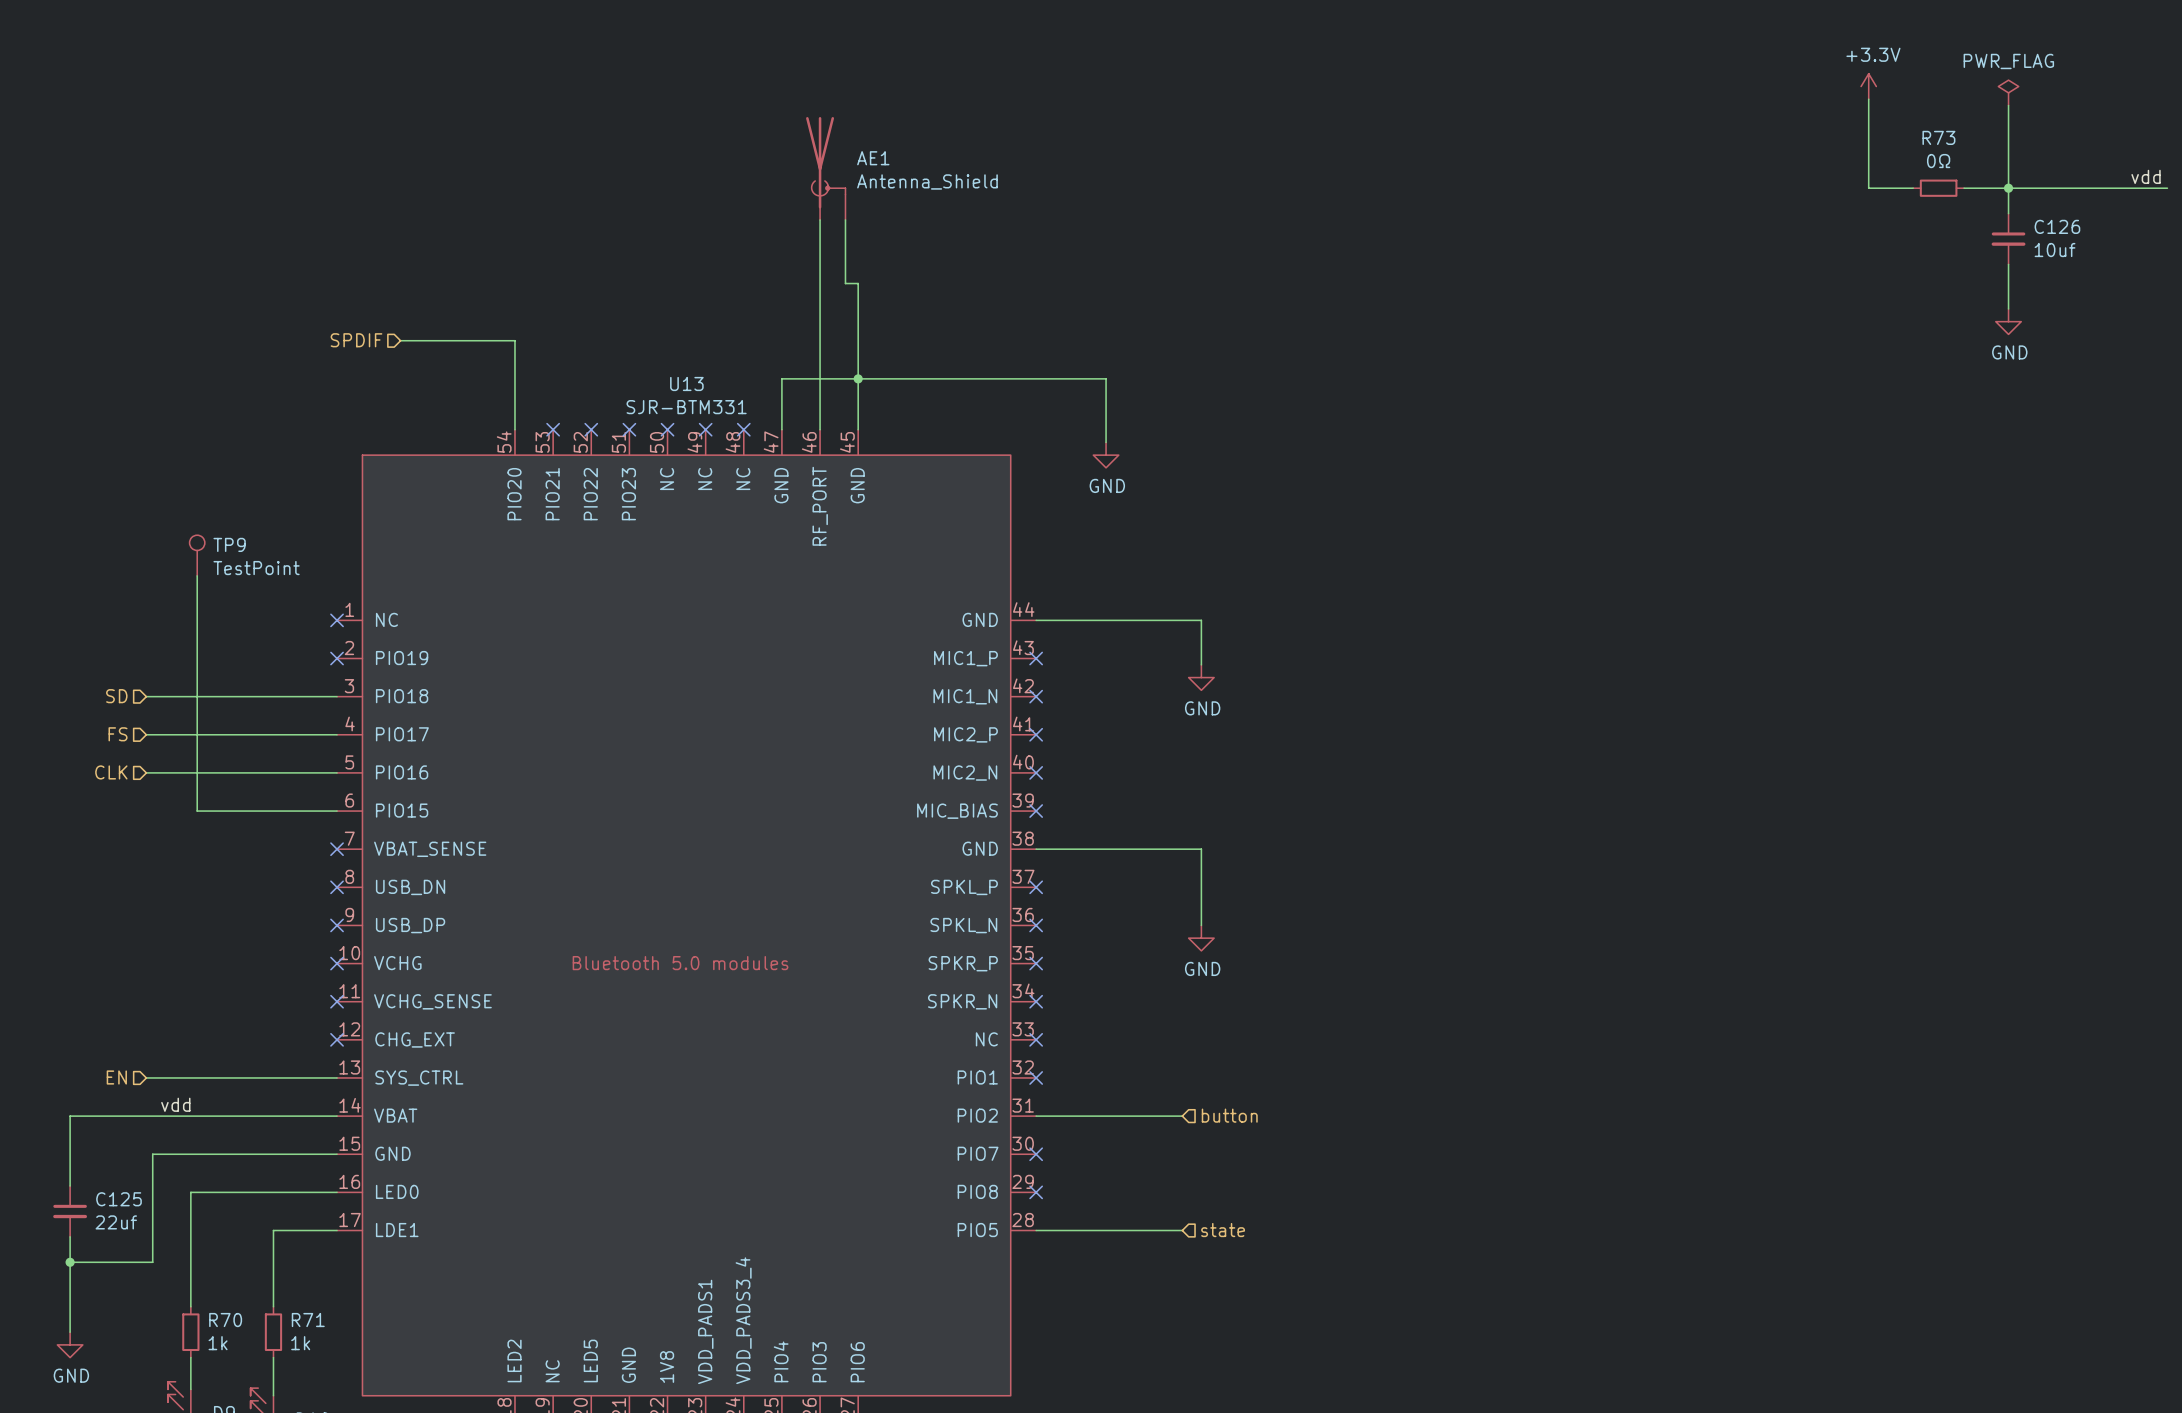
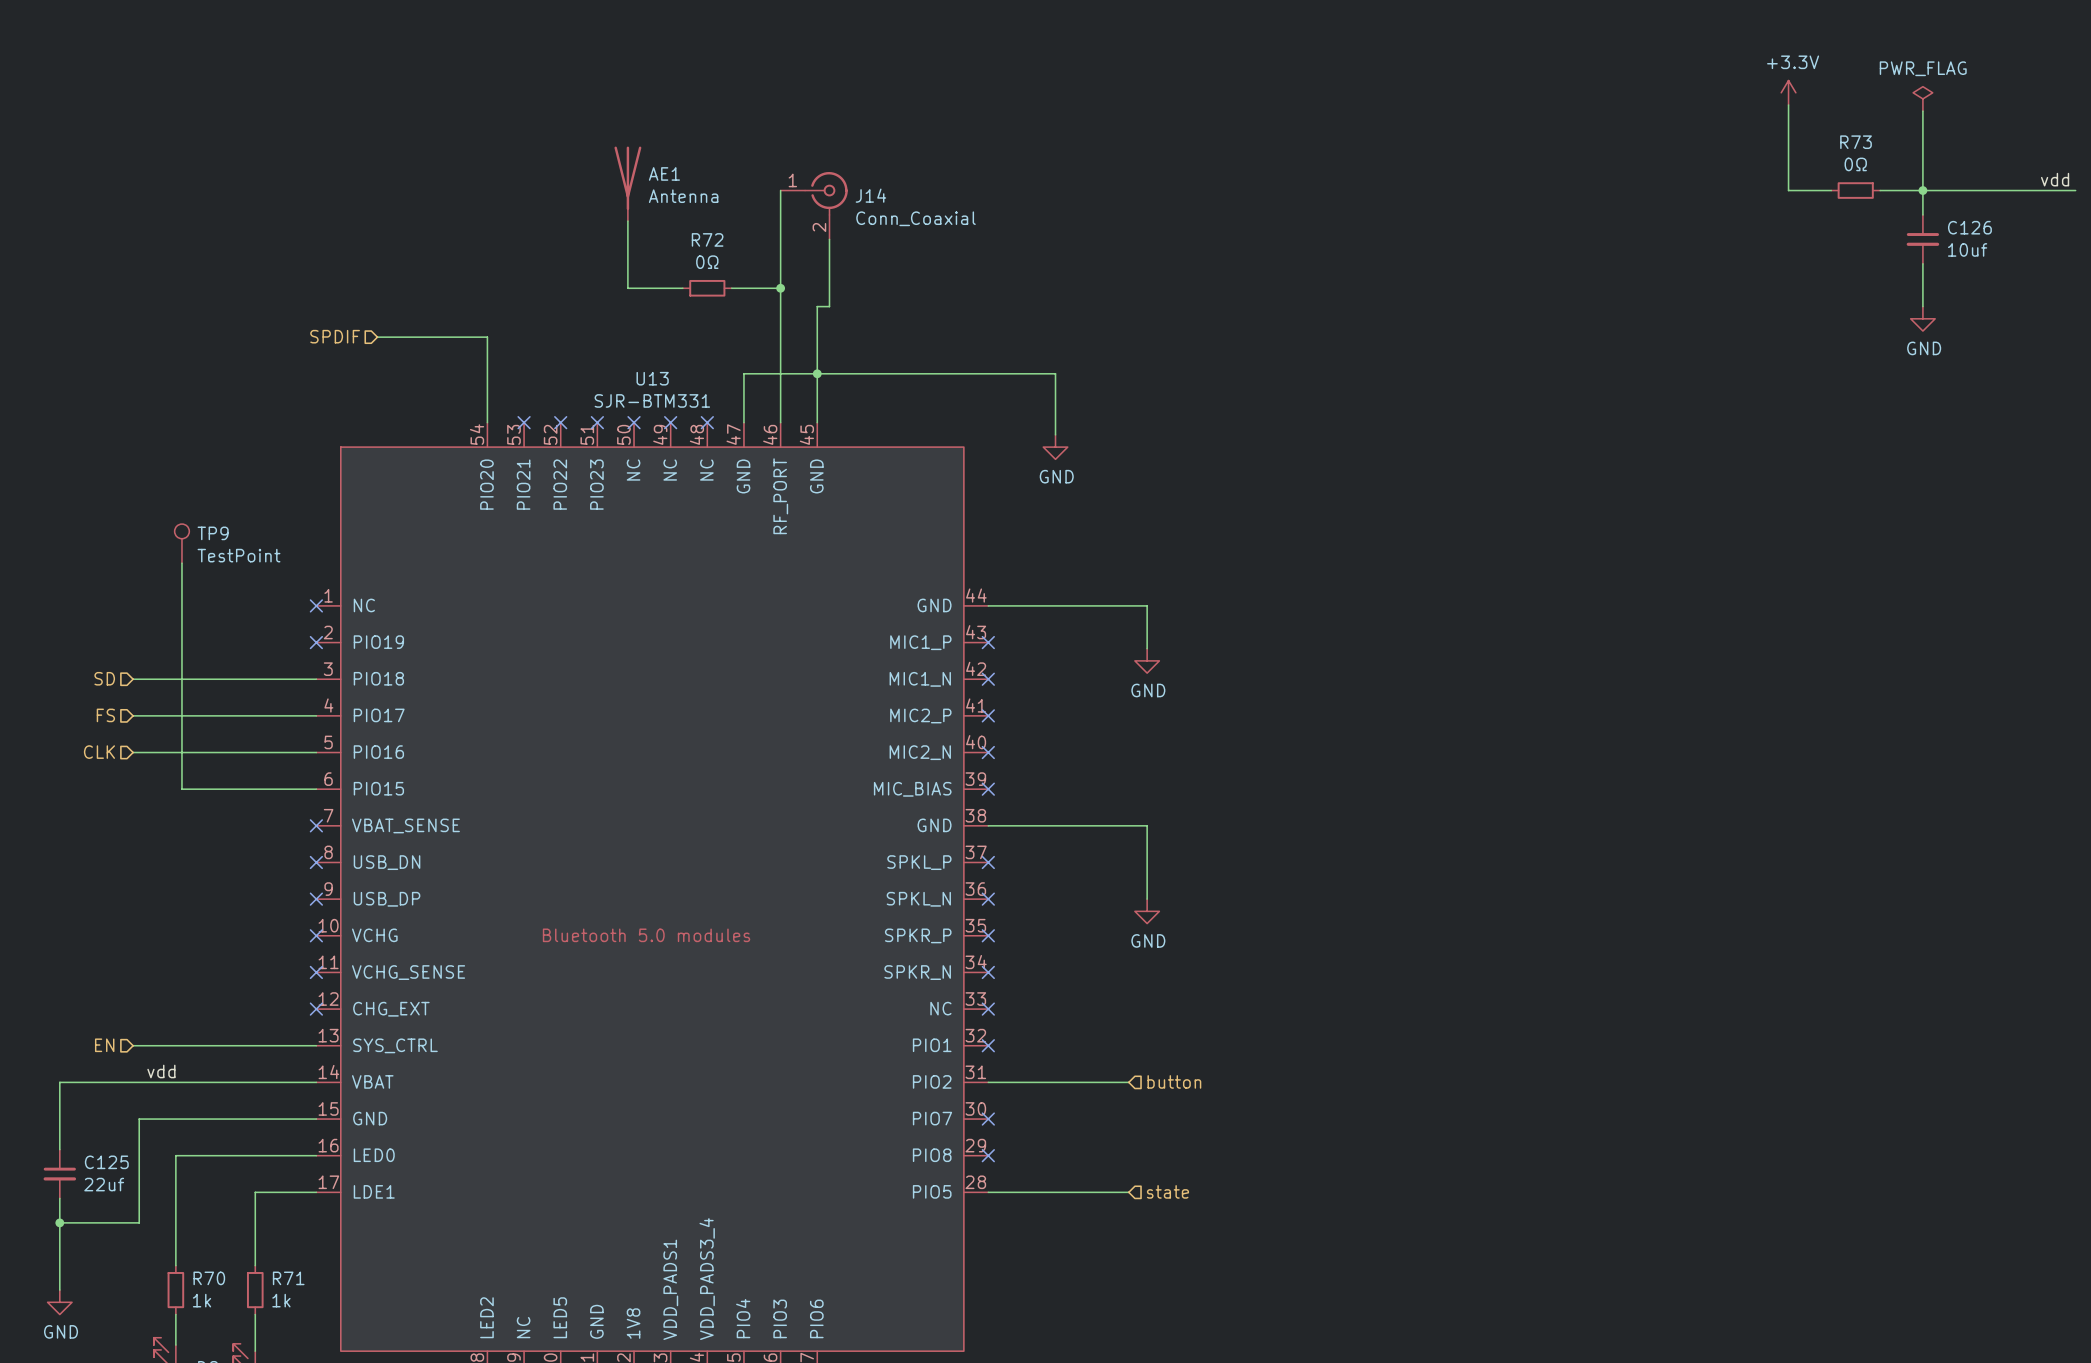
AE1 symbol: [806, 117, 846, 220] -> [614, 146, 642, 222]
AE1 value: Antenna_Shield (927, 181) -> Antenna (683, 196)
J14: none -> Conn_Coaxial (814, 205)
wire: none -> (627, 221) (627, 288) (682, 288)
wire: (845, 219) (845, 283) (858, 283) (858, 308) -> (829, 239) (829, 306) (817, 306)
R72: none -> 0Ω (707, 288)
wire: none -> (731, 288) (780, 288)
junction: none -> (780, 288)

